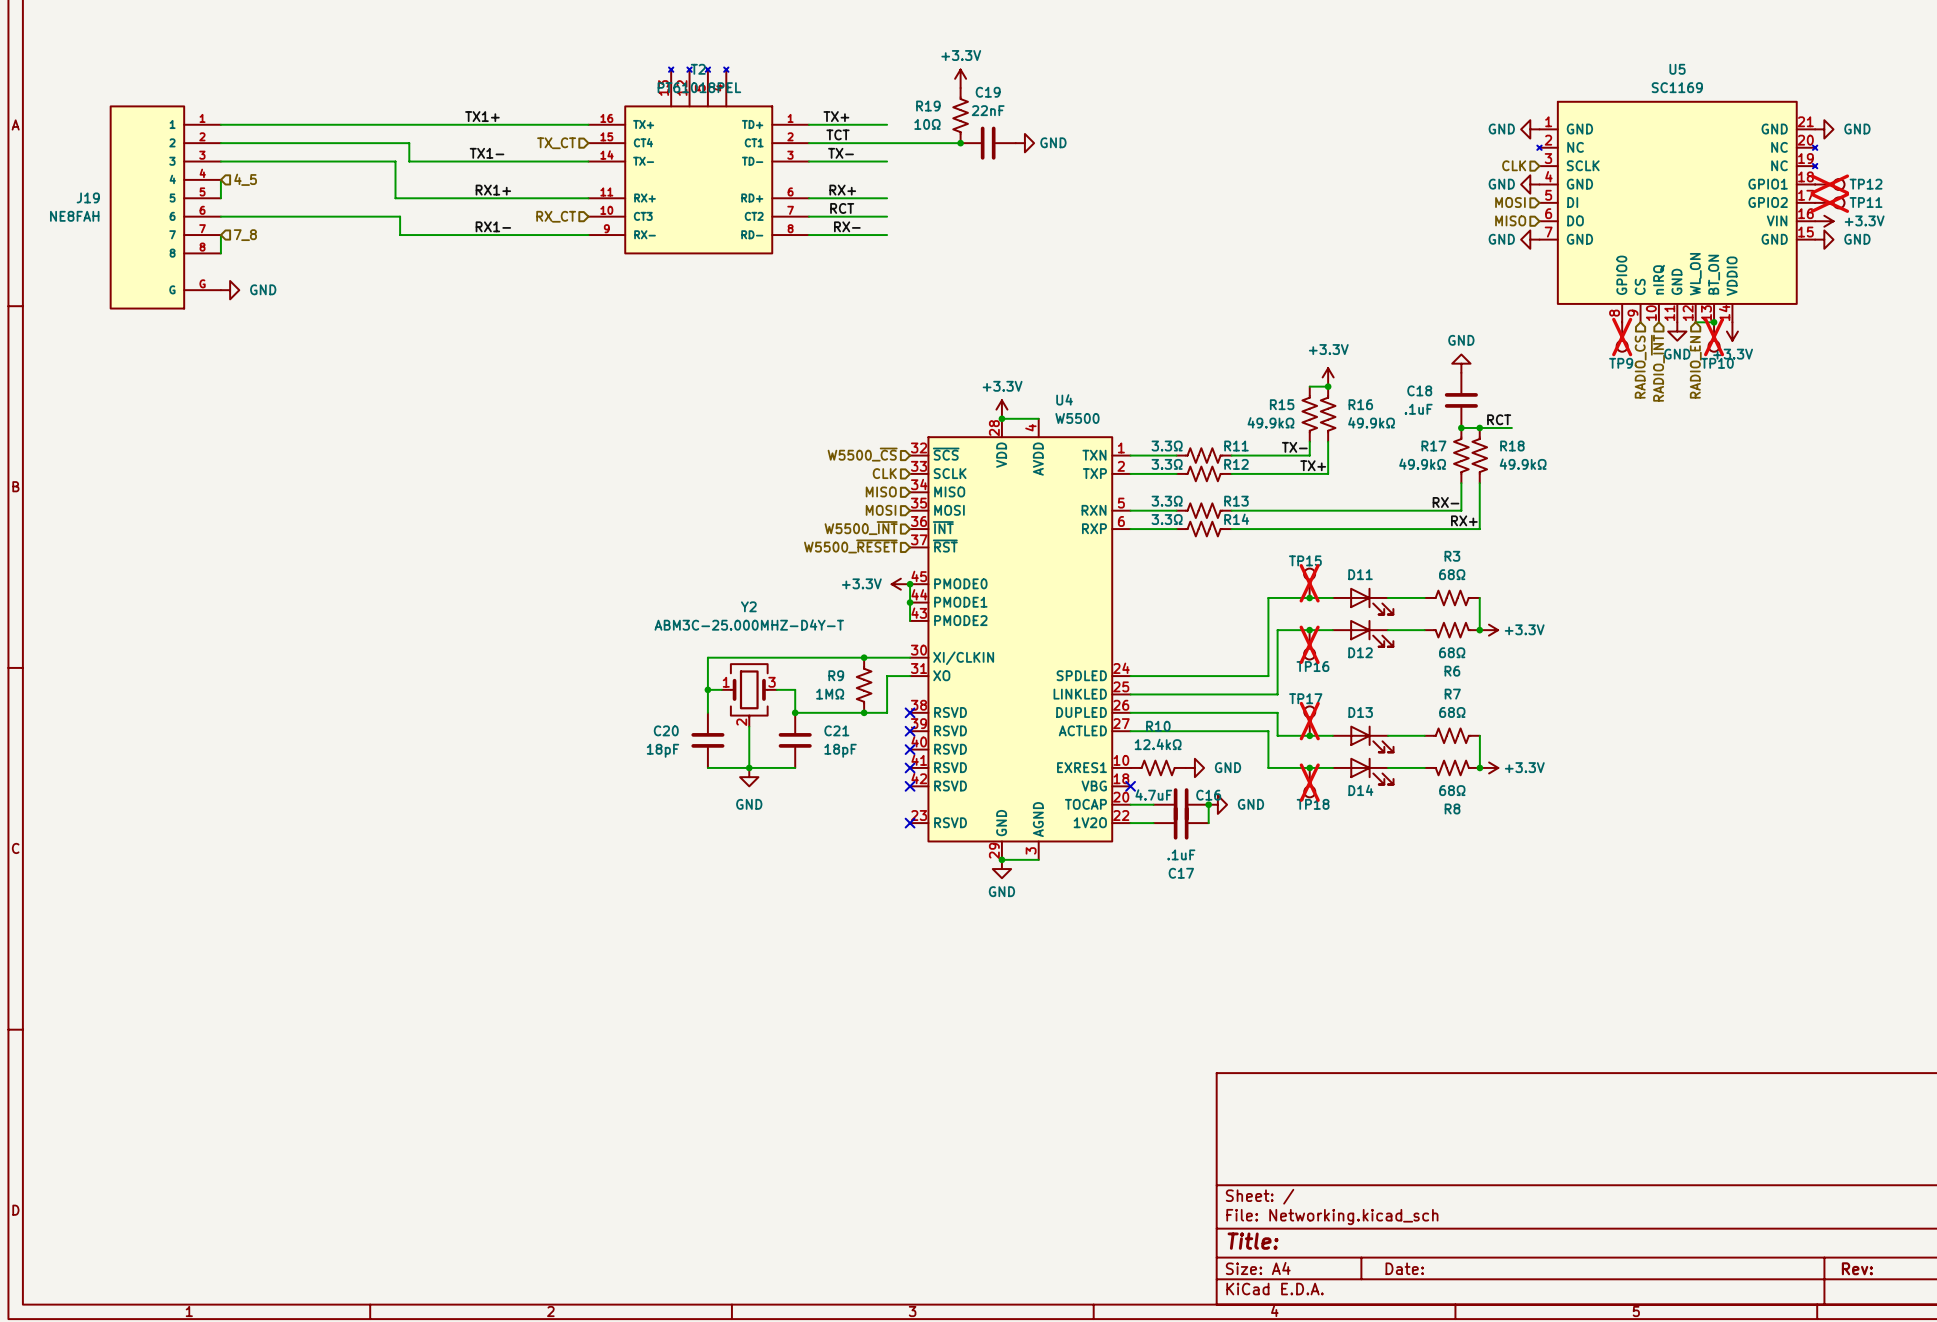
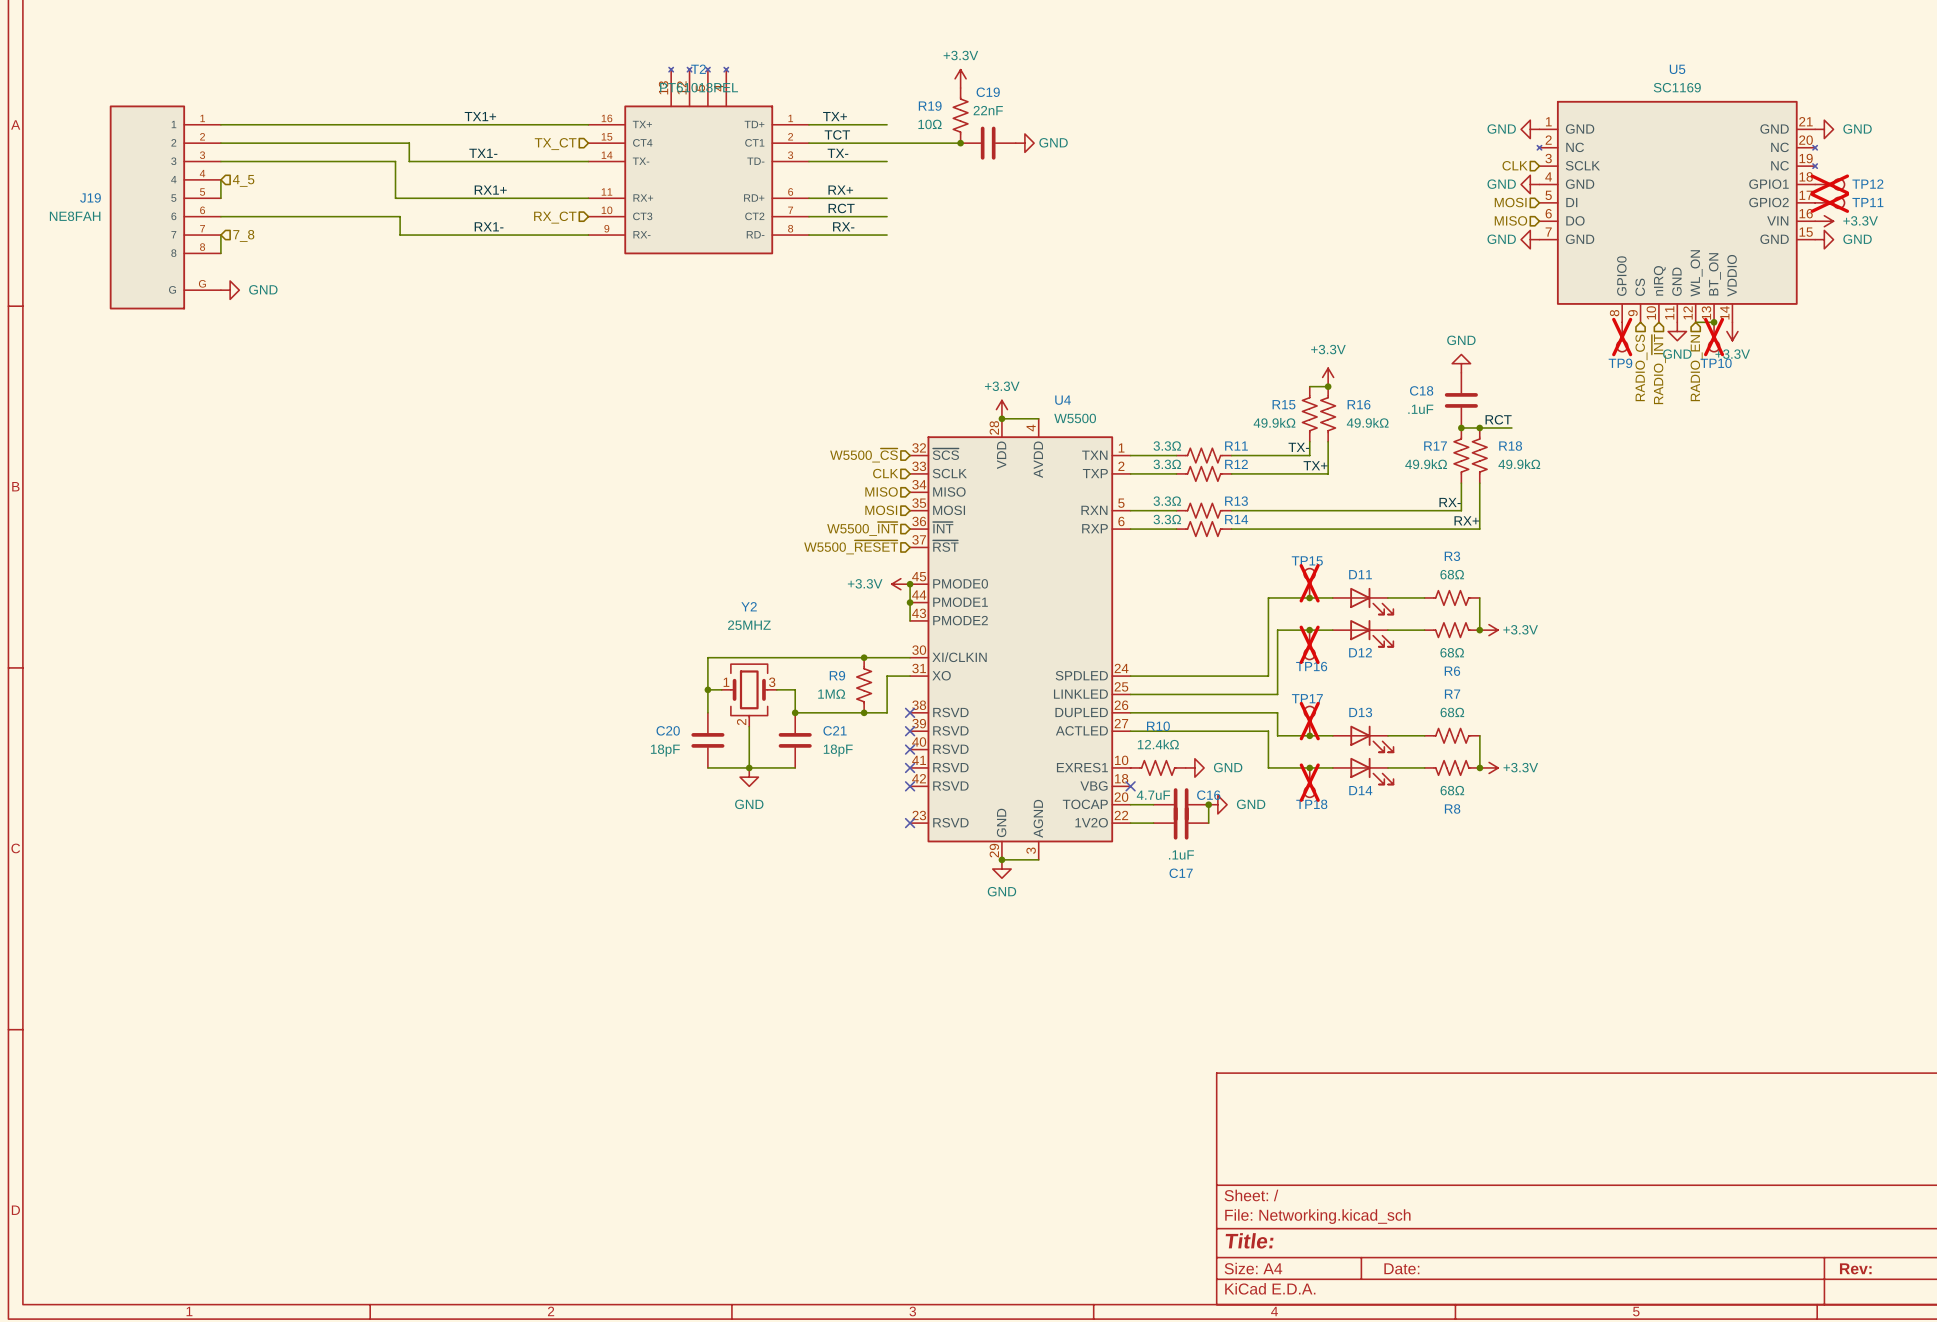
Y2 value: ABM3C-25.000MHZ-D4Y-T (749, 624) -> 25MHZ (749, 625)

